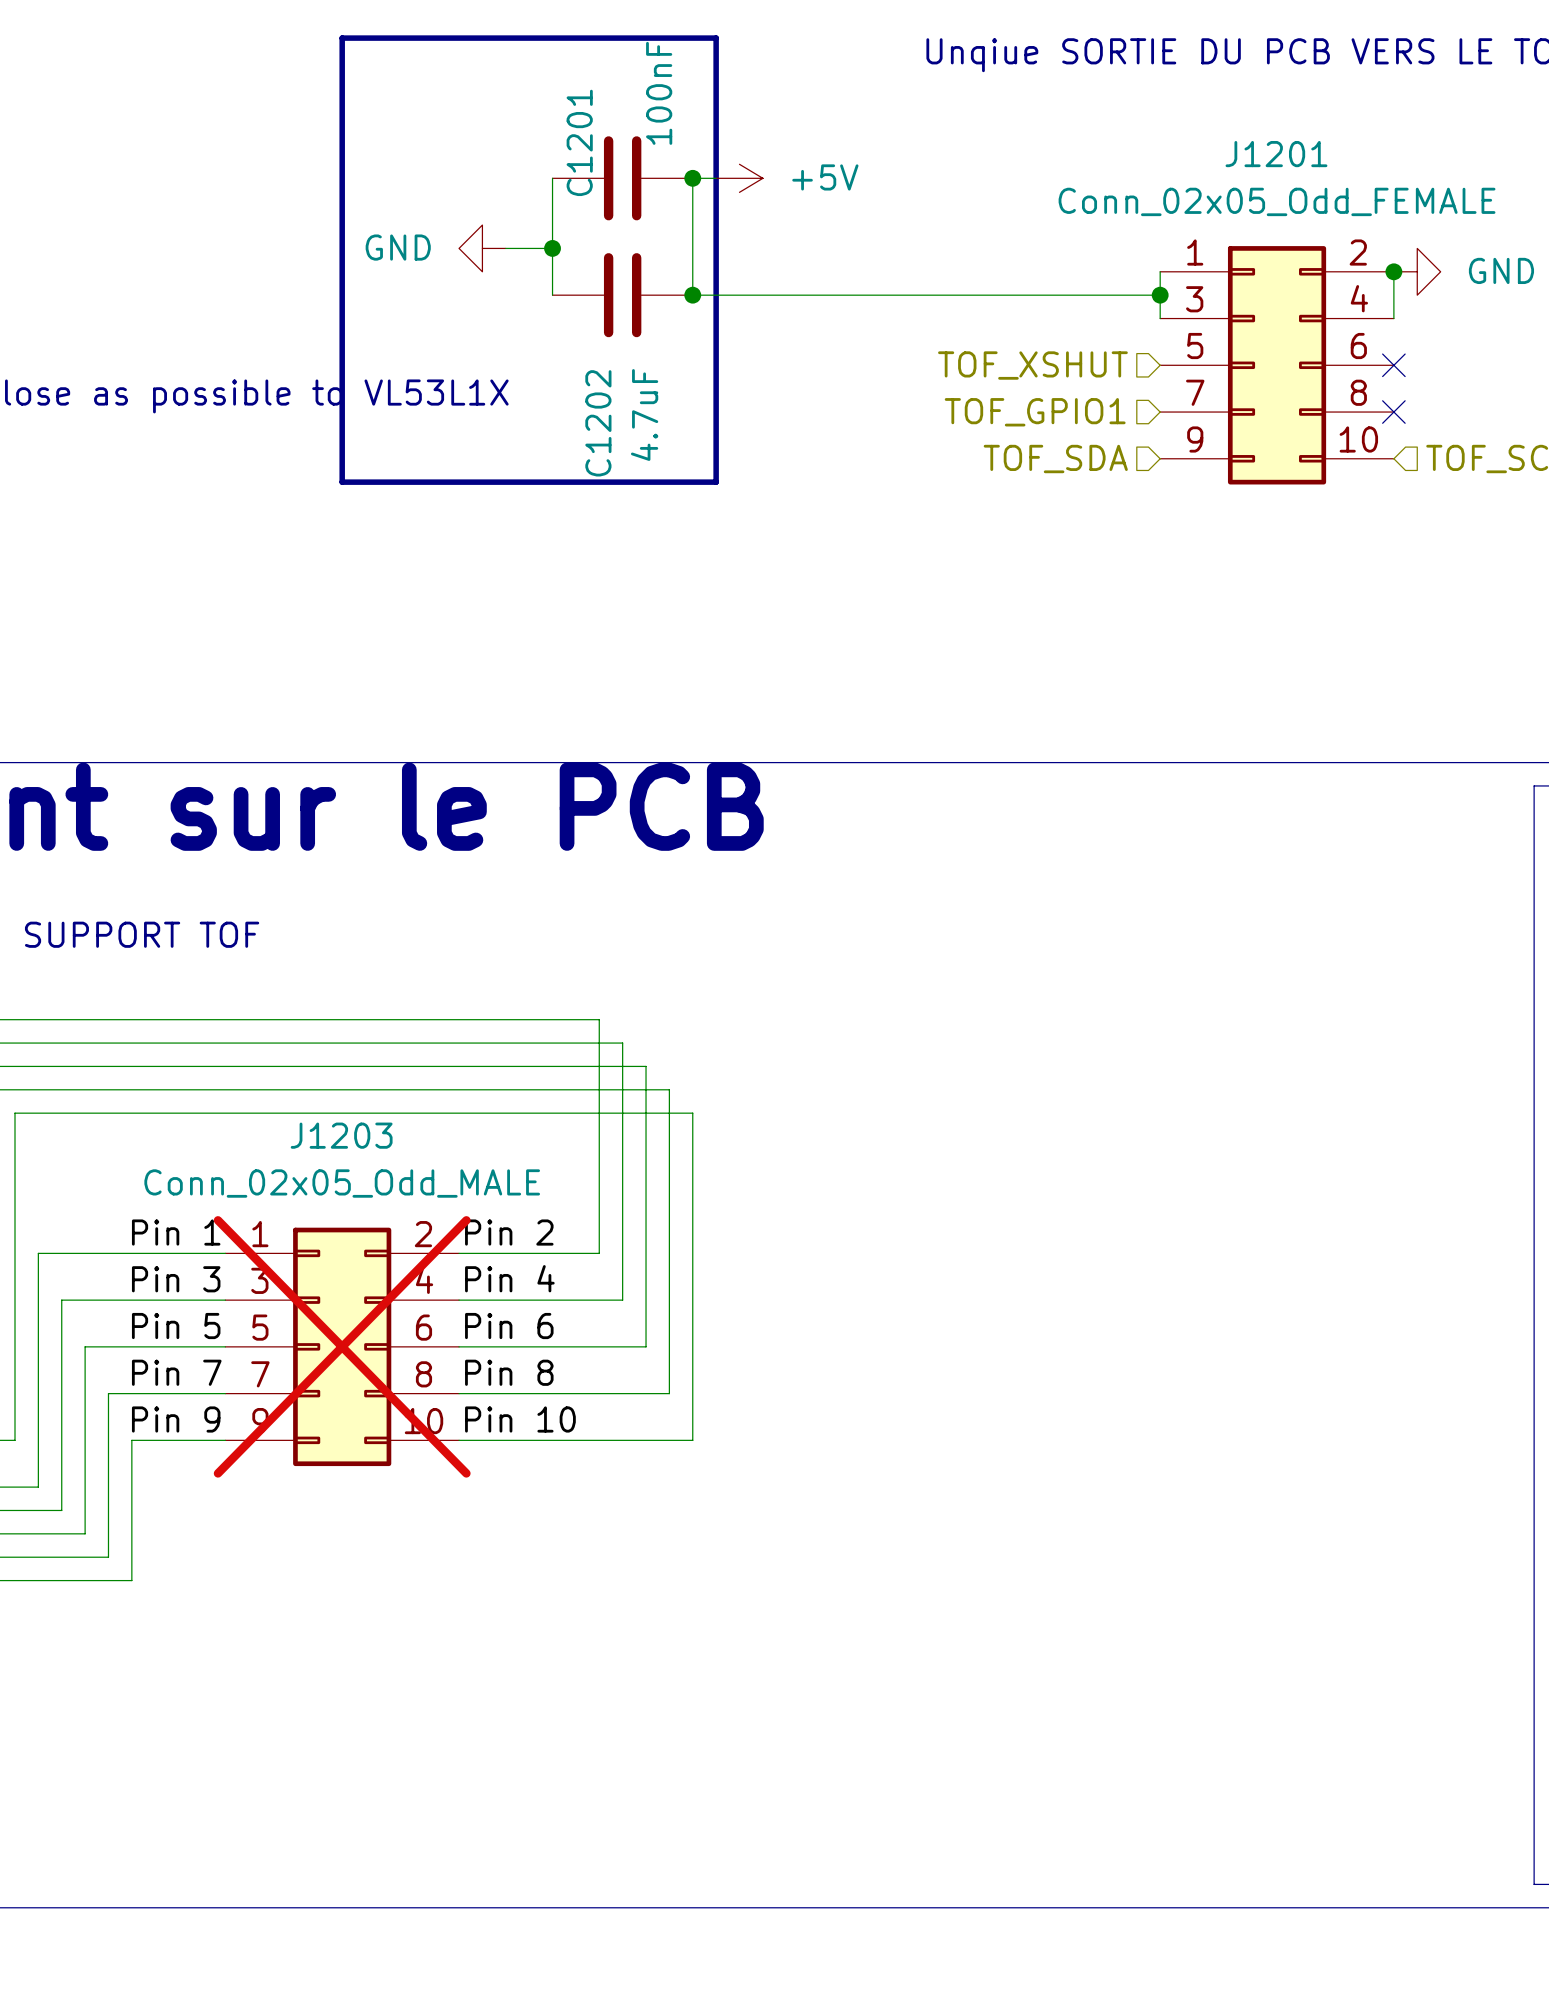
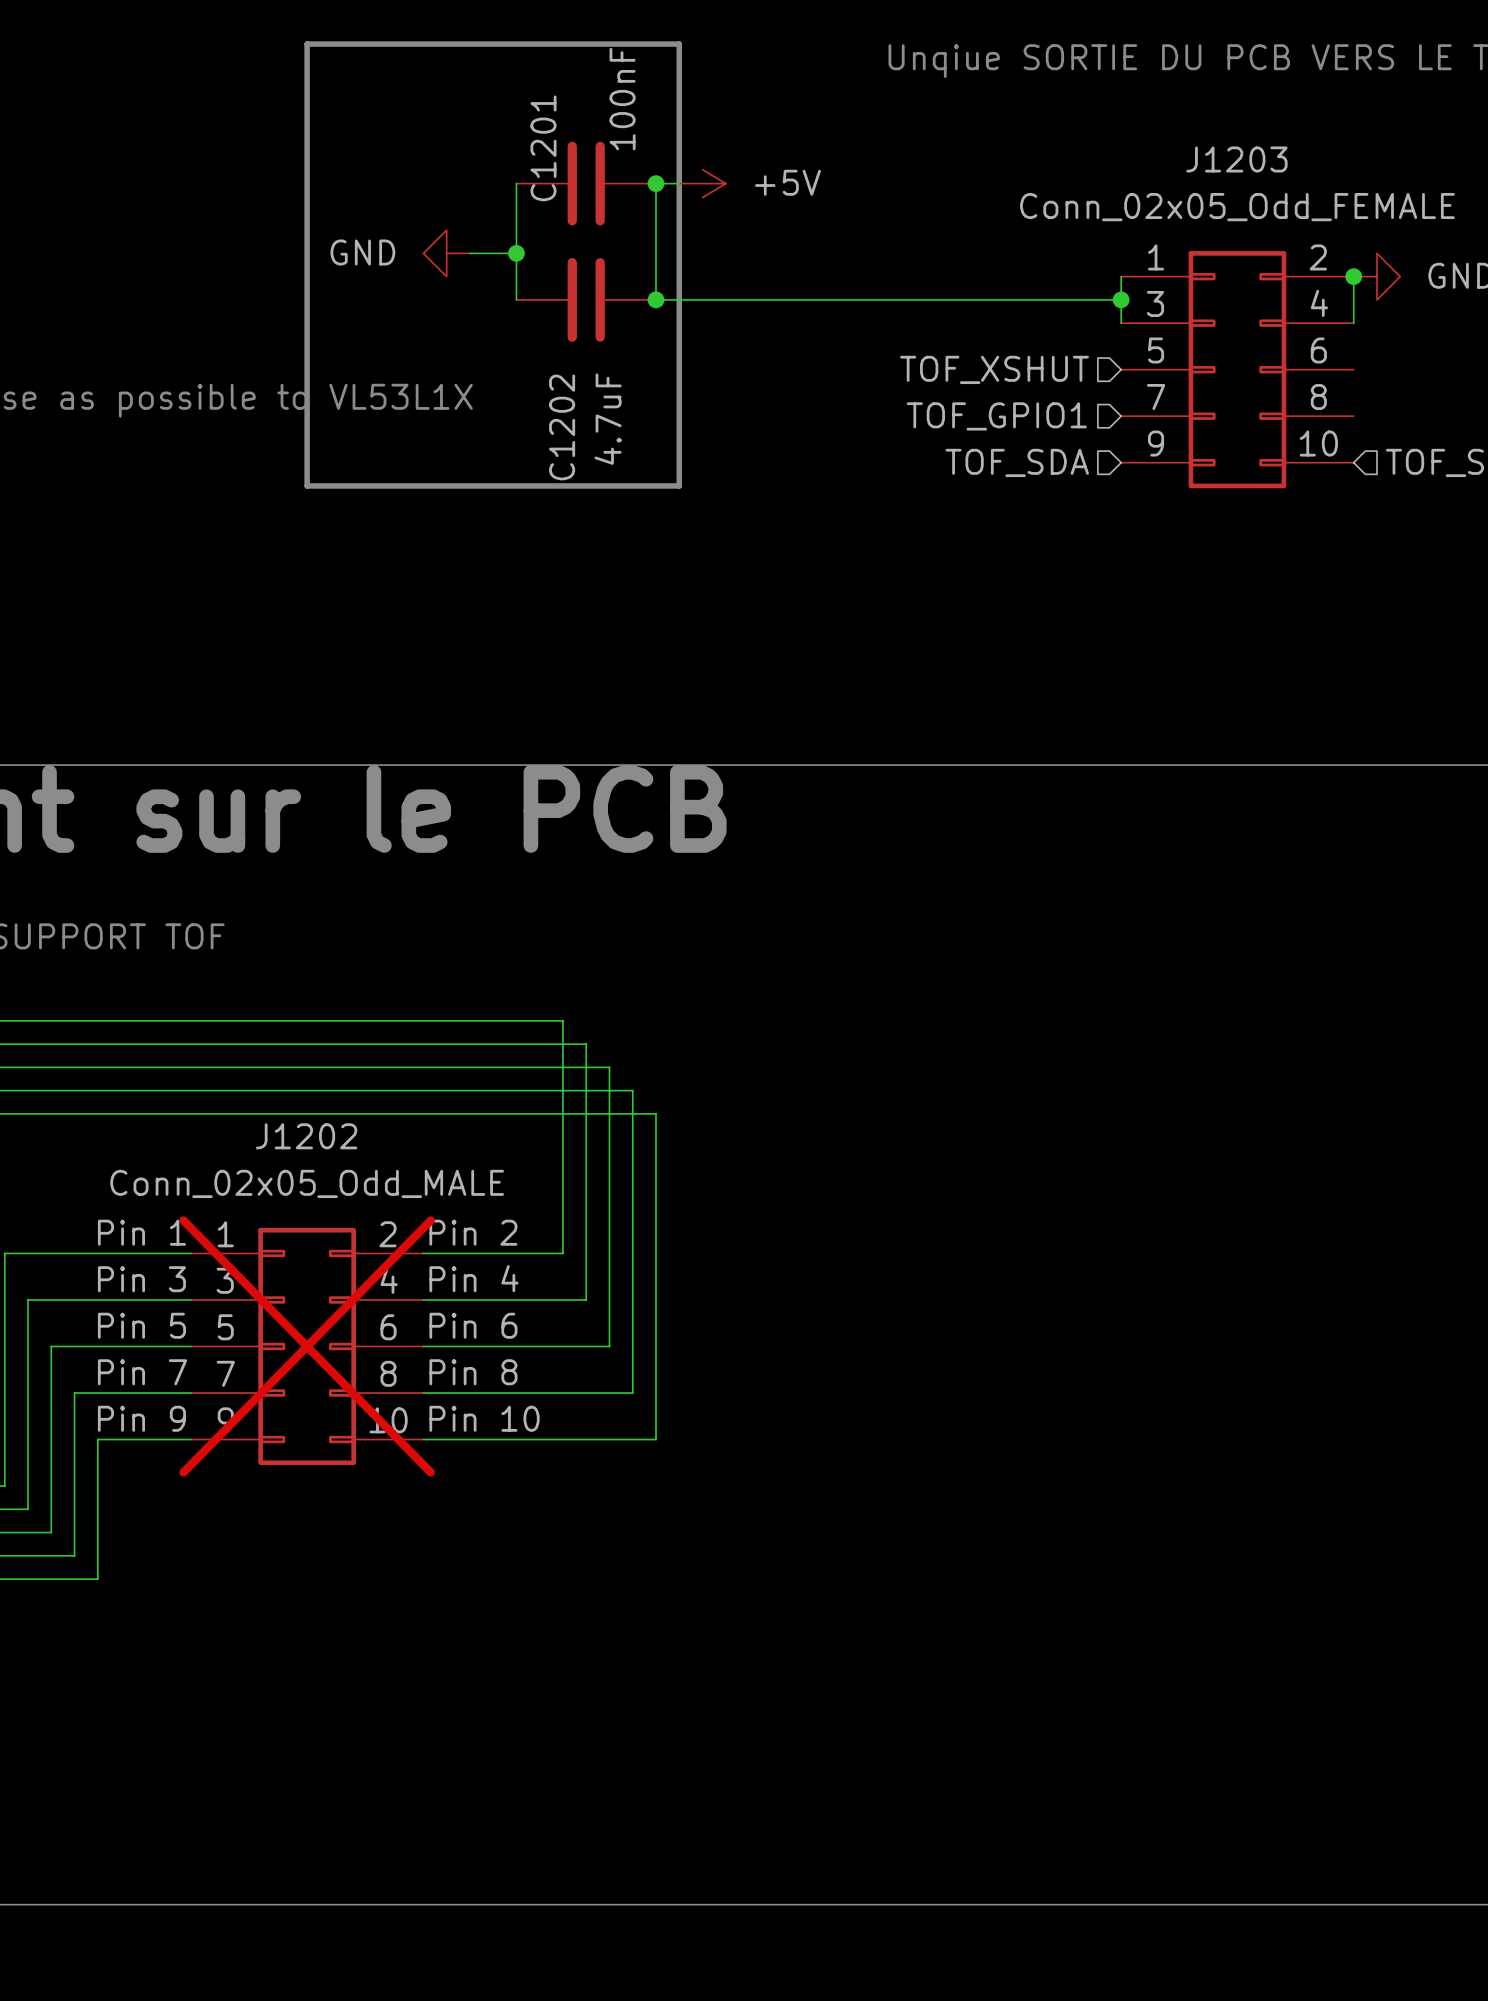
J1201 name: J1201 (1276, 154) -> J1203 (1236, 159)
no-connect mark: (1393, 365) -> none
no-connect mark: (1393, 412) -> none
J1203 name: J1203 (341, 1135) -> J1202 (306, 1136)

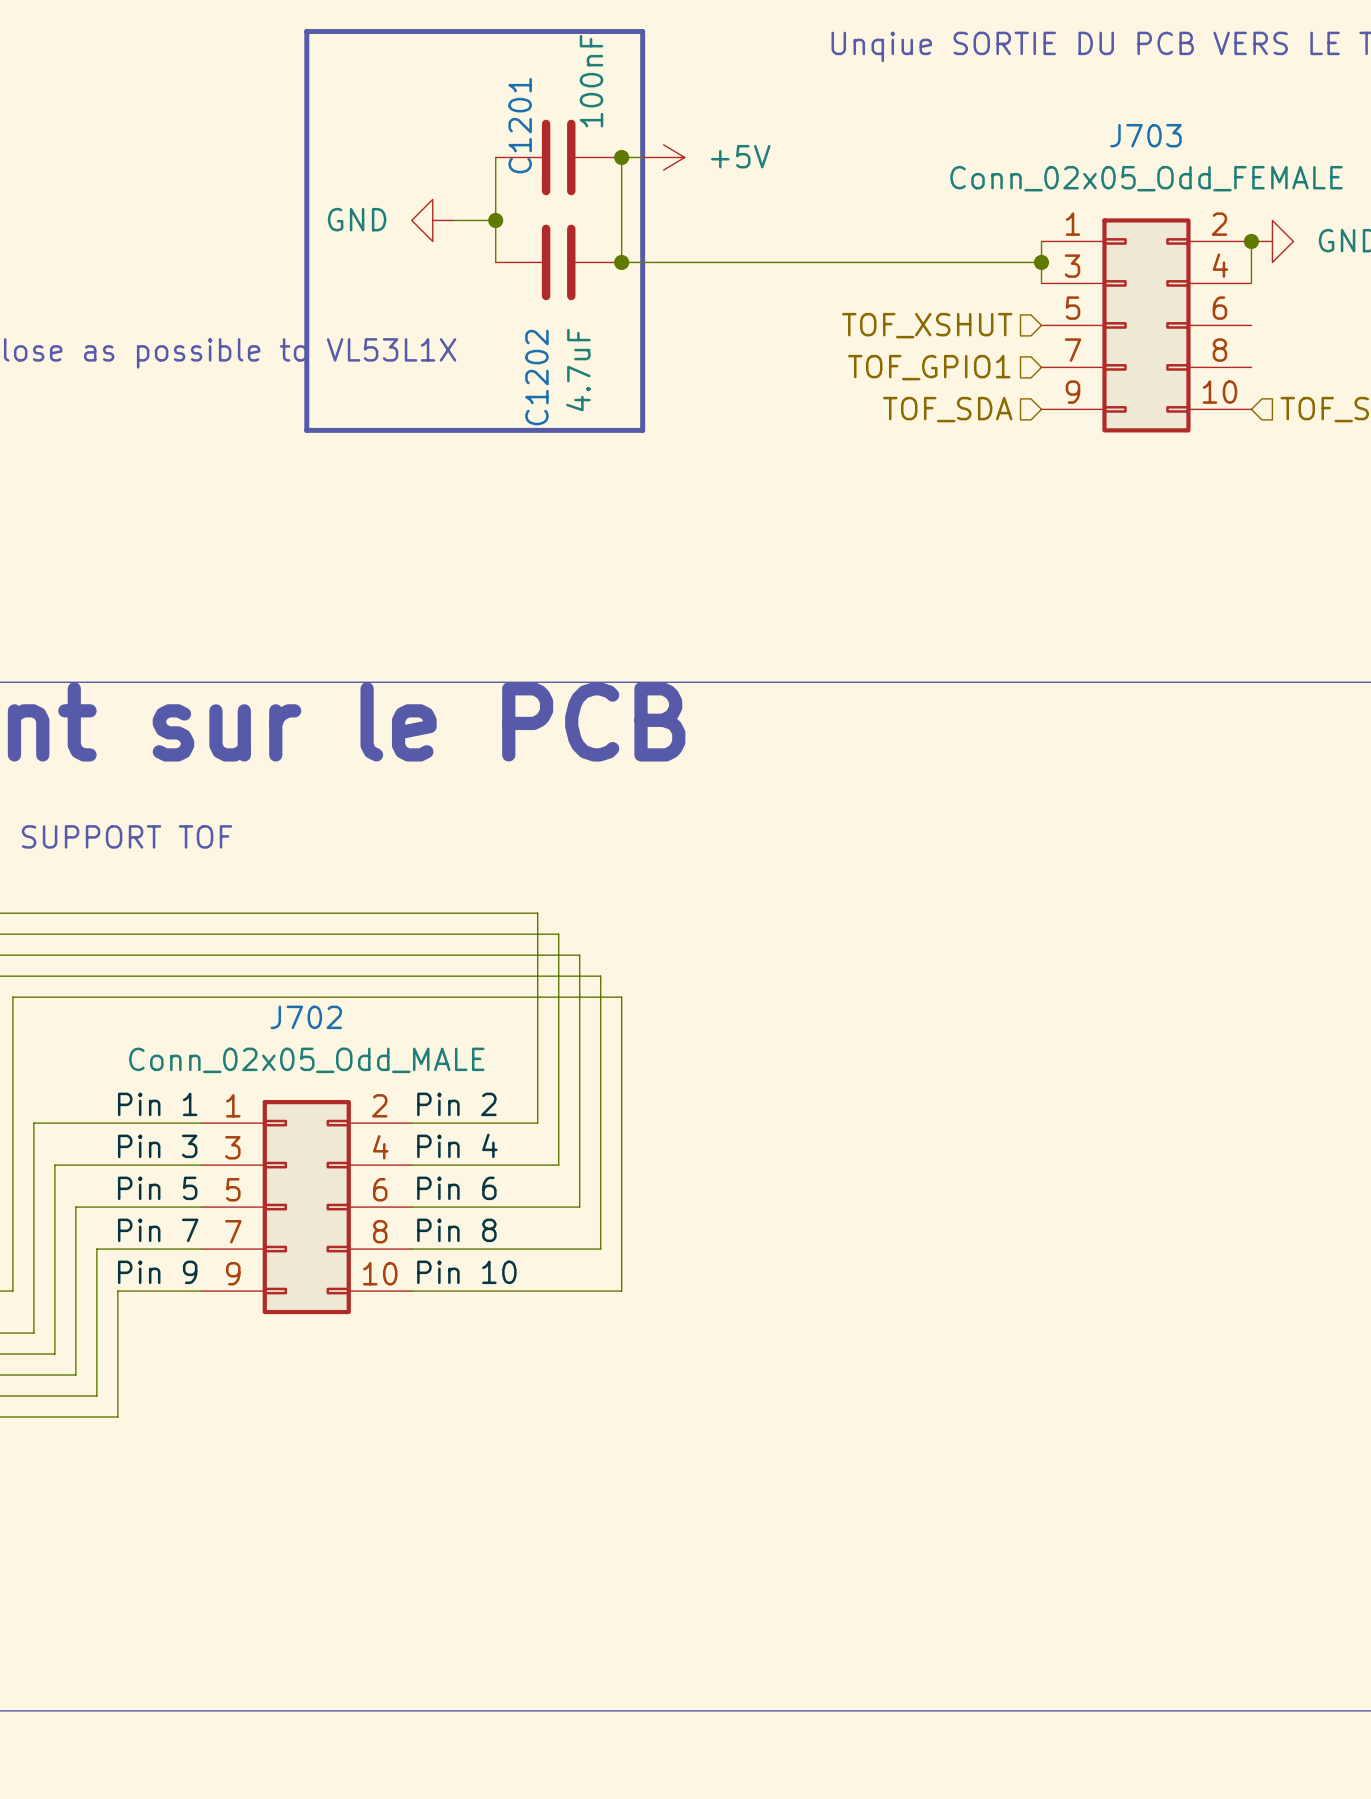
J1203 name: J1203 (1236, 159) -> J703 (1145, 135)
J1202 name: J1202 (306, 1136) -> J702 (306, 1017)
J1202 do-not-place cross: (307, 1346) -> none

